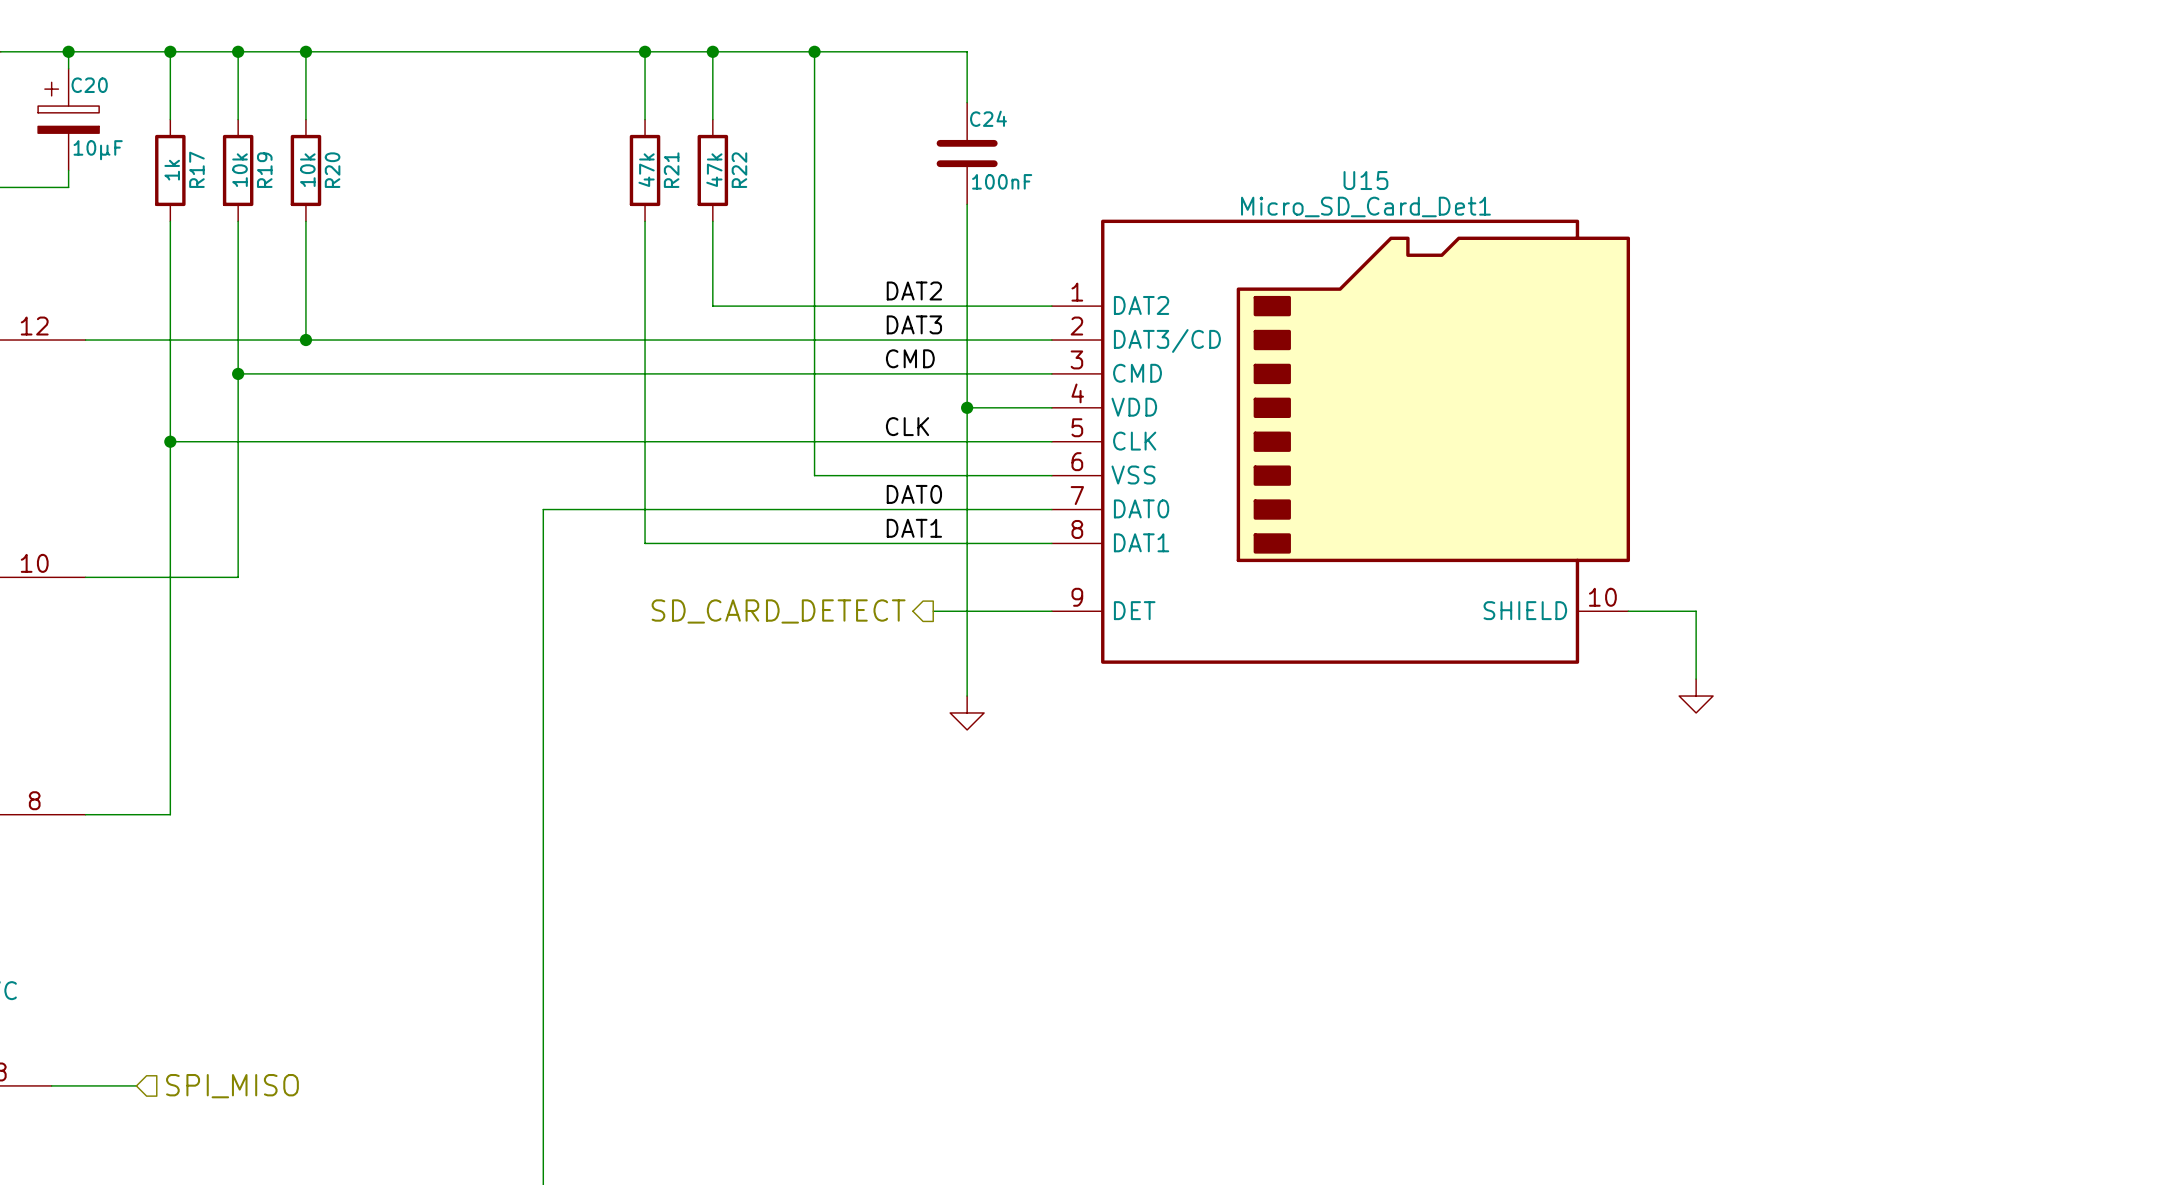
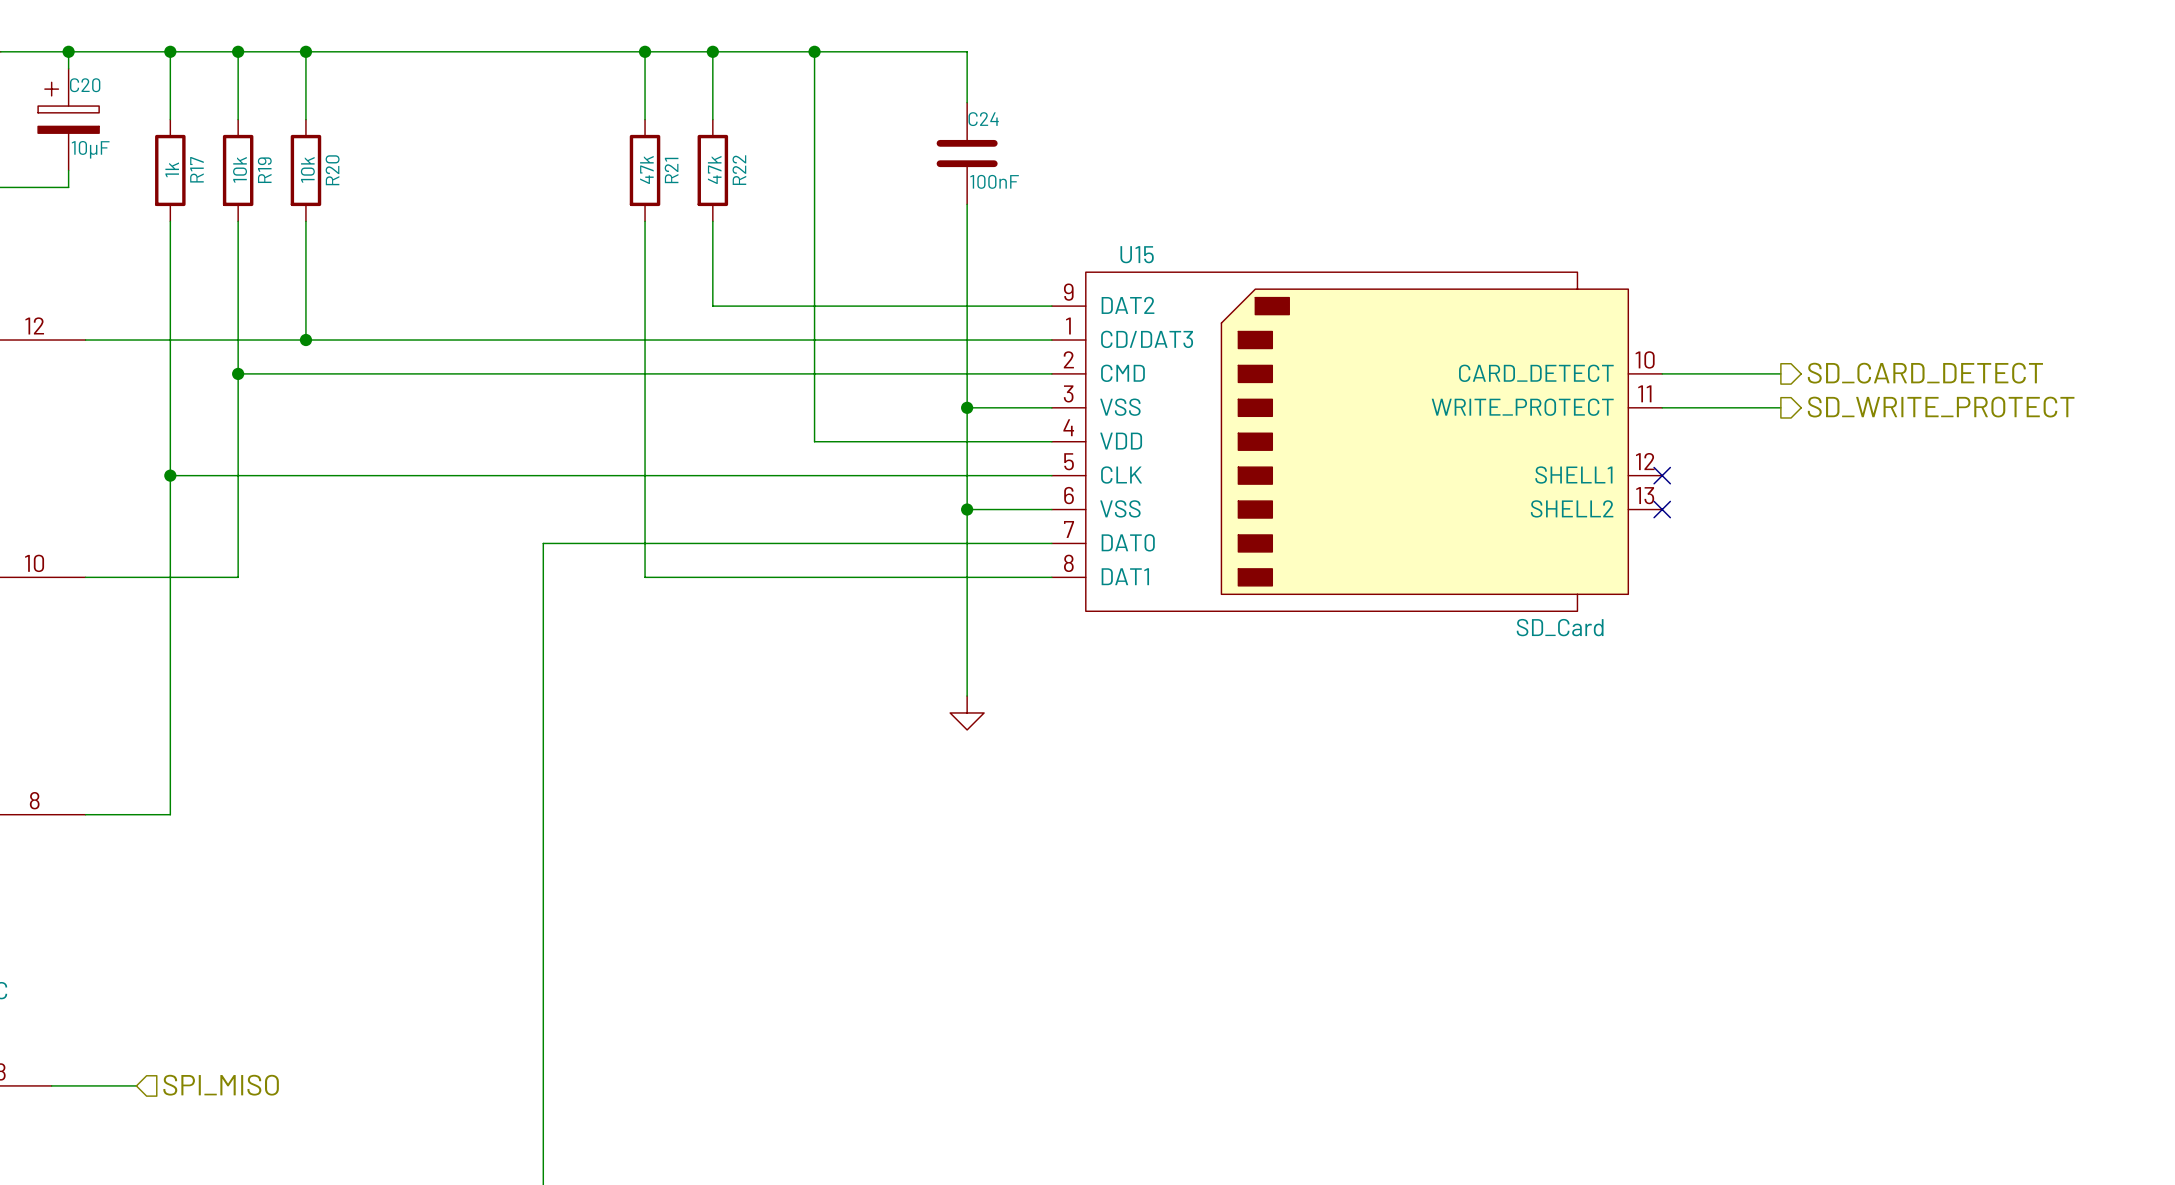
U15 name position: U15 (1365, 180) -> U15 (1137, 254)
U15 value: Micro_SD_Card_Det1 (1365, 206) -> SD_Card (1560, 627)
U15 symbol: [1051, 219, 1631, 664] -> [1051, 272, 1663, 612]
label: DAT2 (914, 290) -> none
label: DAT3 (914, 324) -> none
label: CMD (910, 358) -> none
wire: none -> (1662, 373) (1780, 373)
hierarchical label: none -> SD_CARD_DETECT (1925, 373)
wire: none -> (1662, 407) (1780, 407)
hierarchical label: none -> SD_WRITE_PROTECT (1941, 407)
label: CLK (907, 426) -> none
wire: (170, 441) (814, 441) (814, 475) -> (170, 475) (814, 475)
junction position: (170, 441) -> (170, 475)
no-connect mark: none -> (1662, 475)
label: DAT0 (914, 494) -> none
wire: (967, 509) (543, 509) (543, 543) -> (1051, 577) (645, 577) (645, 543) (543, 543)
junction: none -> (967, 509)
no-connect mark: none -> (1662, 509)
label: DAT1 (914, 528) -> none
hierarchical label: SD_CARD_DETECT (778, 611) -> none
wire: (933, 611) (1051, 611) -> none
wire: (1628, 611) (1696, 611) (1696, 679) -> none
power symbol: (1696, 696) -> none

